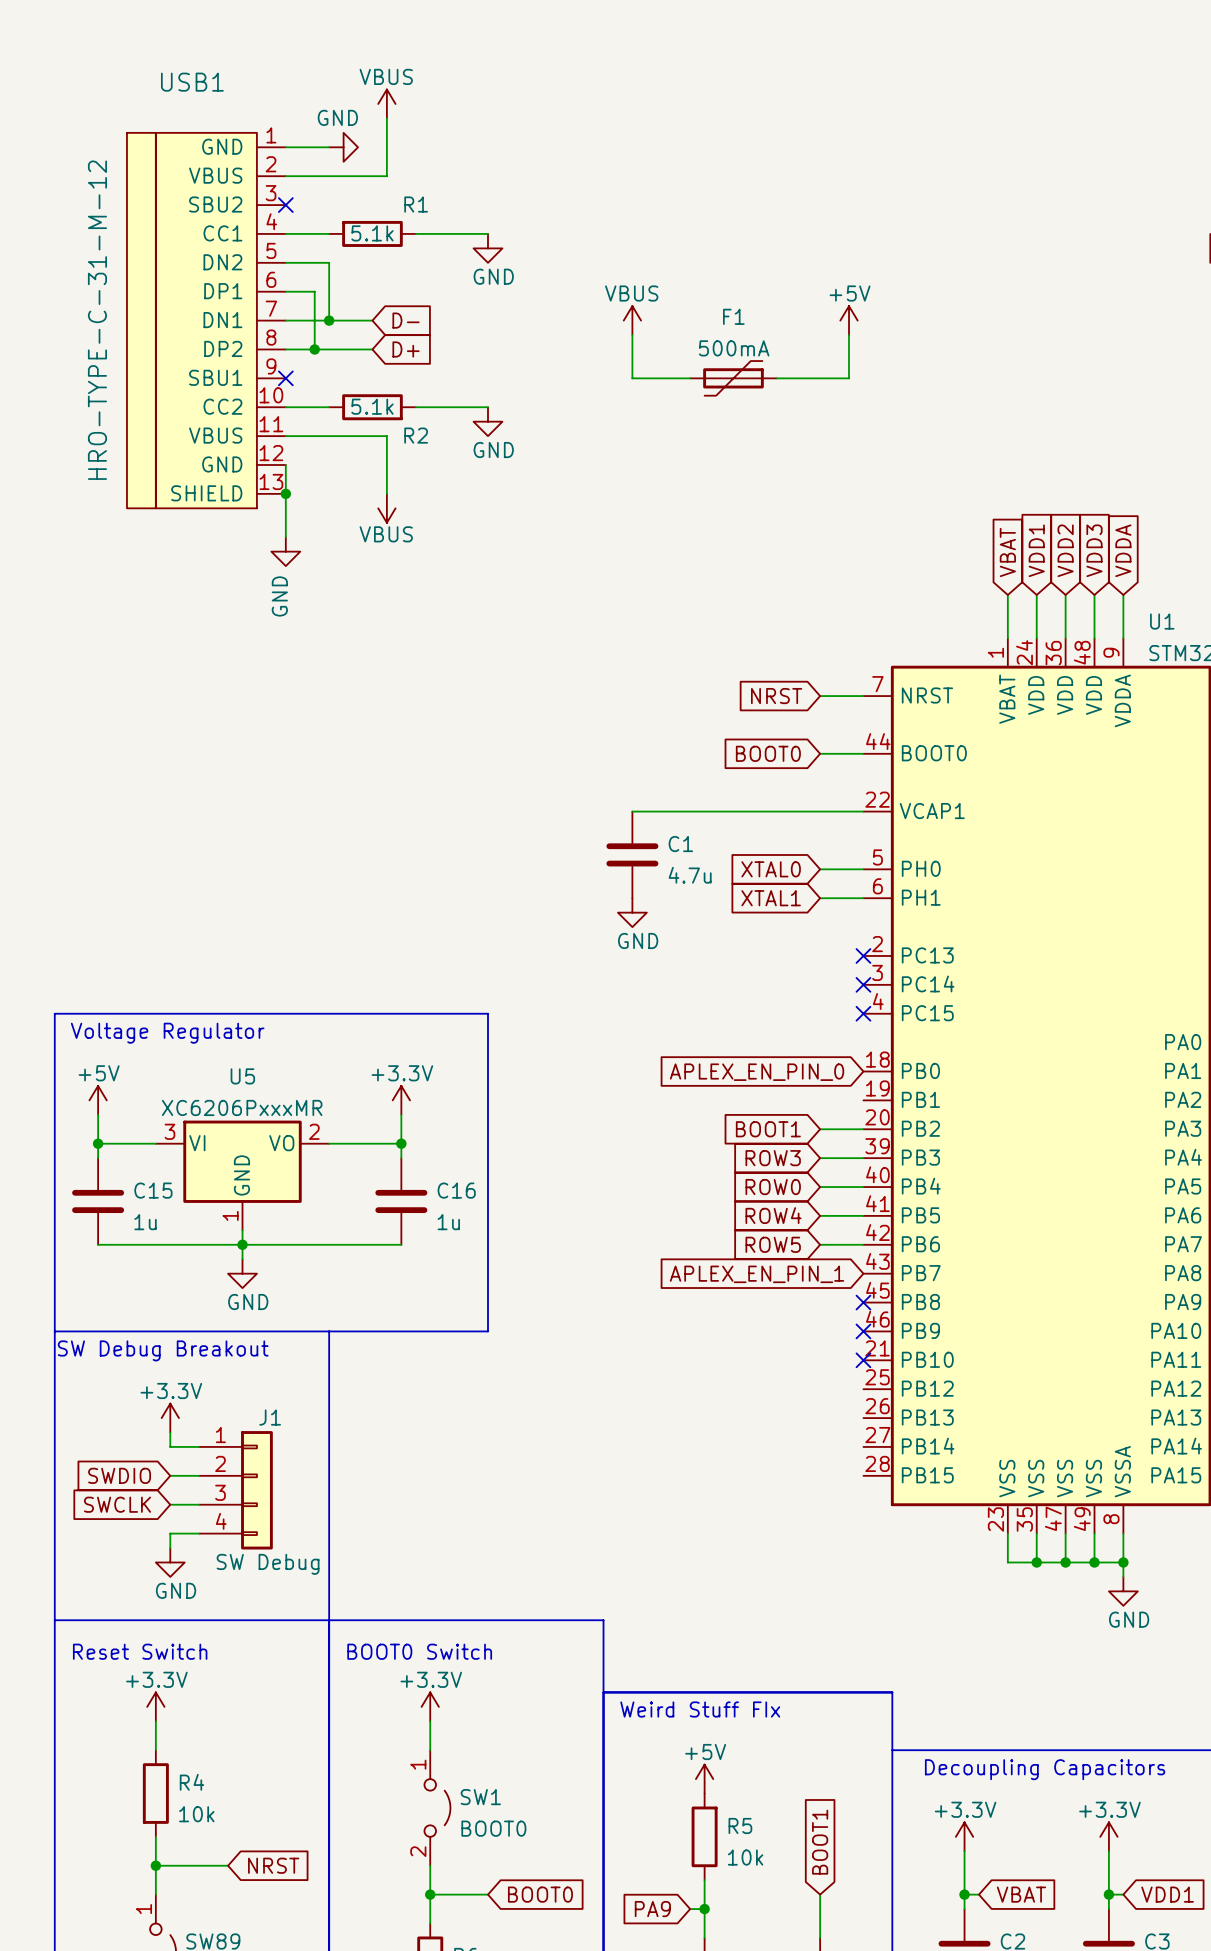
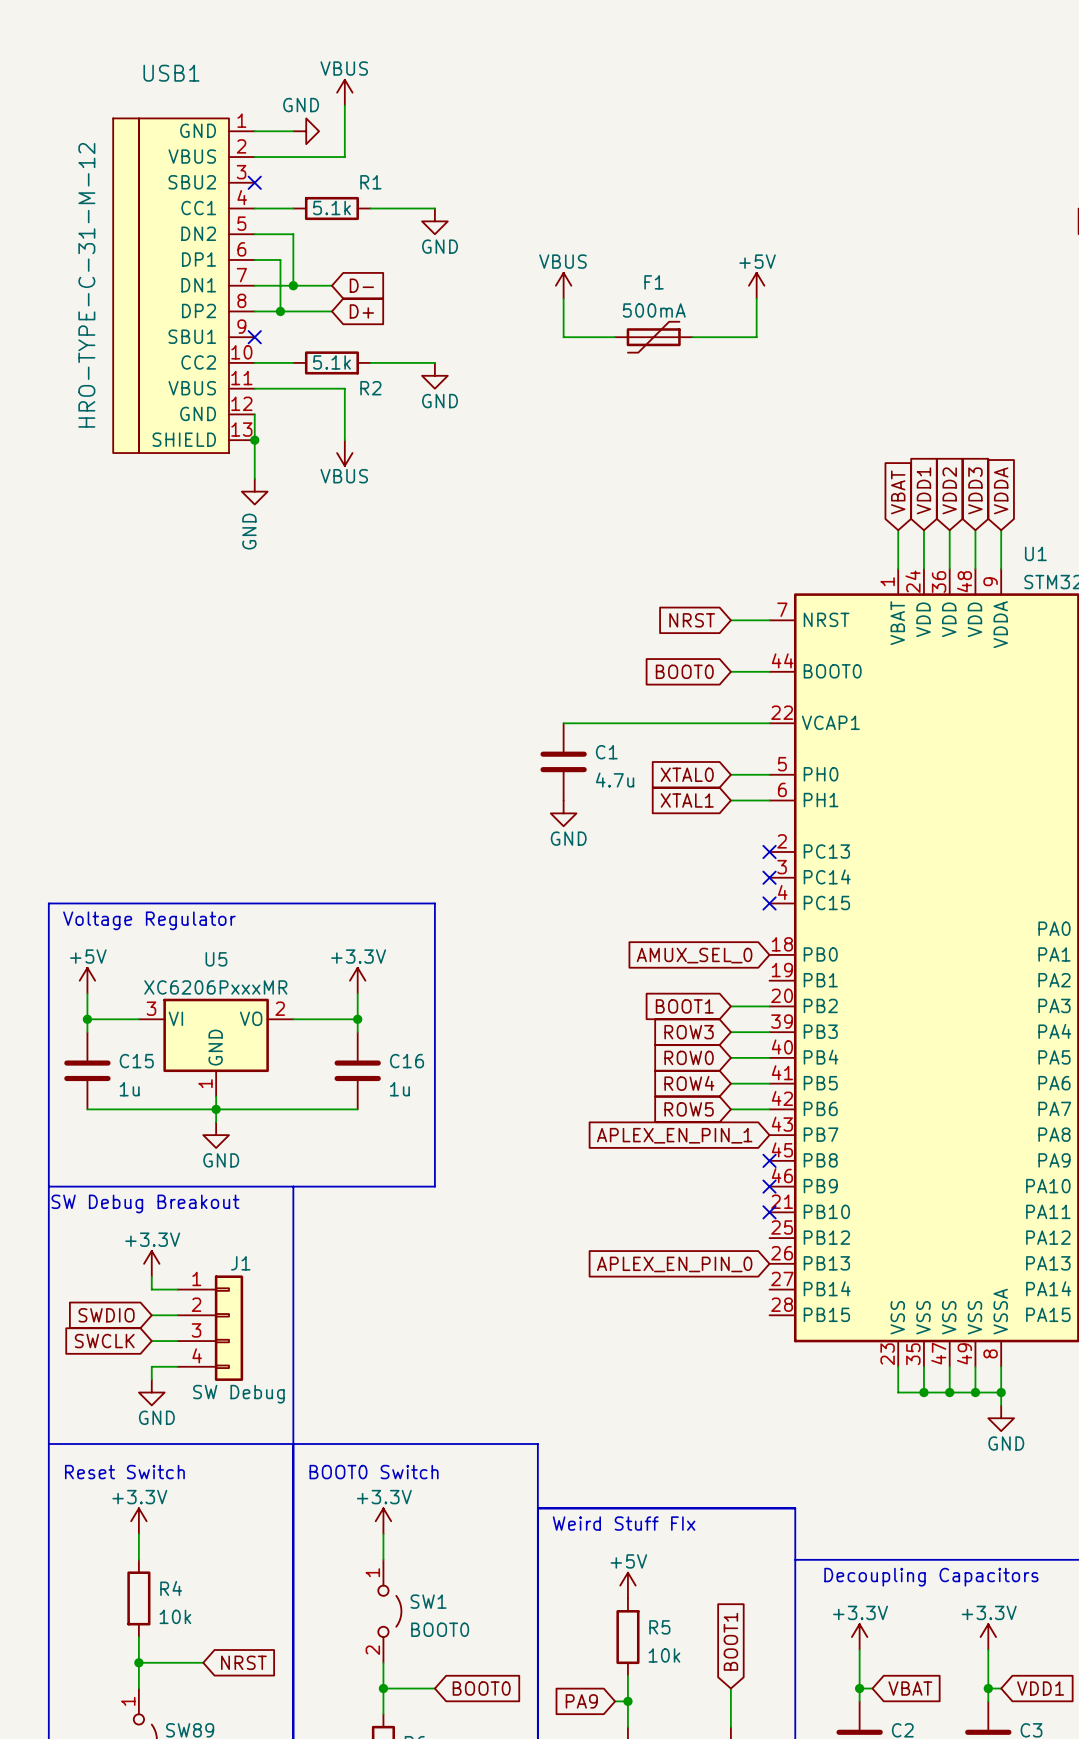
global label: APLEX_EN_PIN_0 (757, 1072) -> AMUX_SEL_0 (694, 955)
global label: none -> APLEX_EN_PIN_0 (674, 1264)

